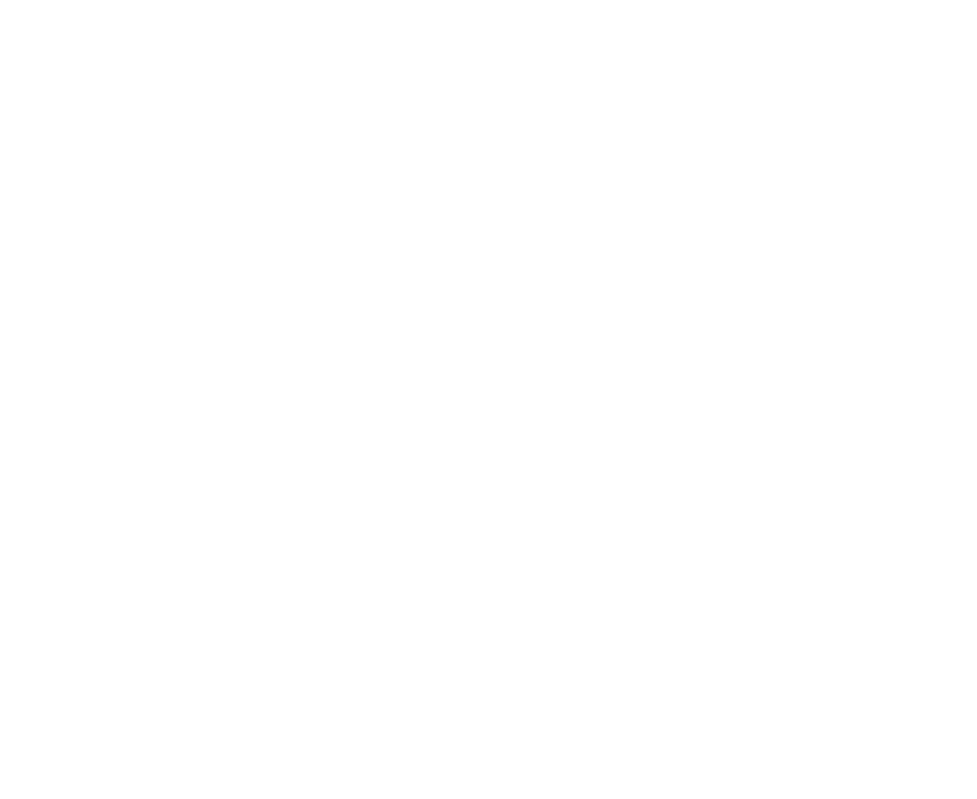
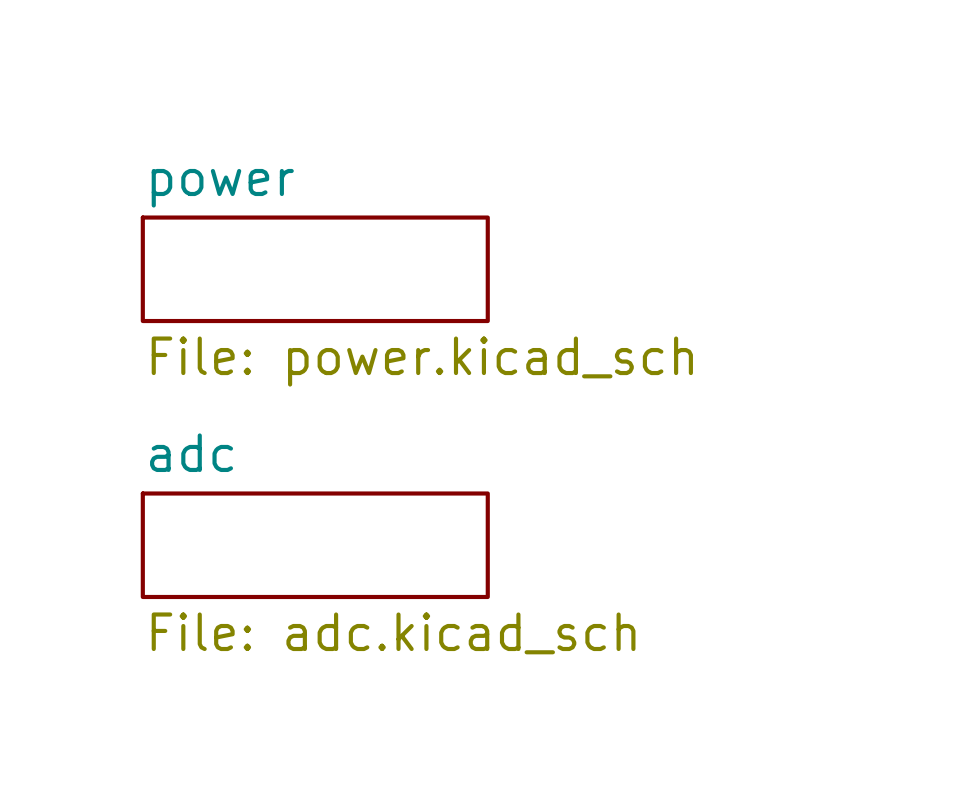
sheet power: none -> File: power.kicad_sch (315, 269)
sheet adc: none -> File: adc.kicad_sch (315, 545)

